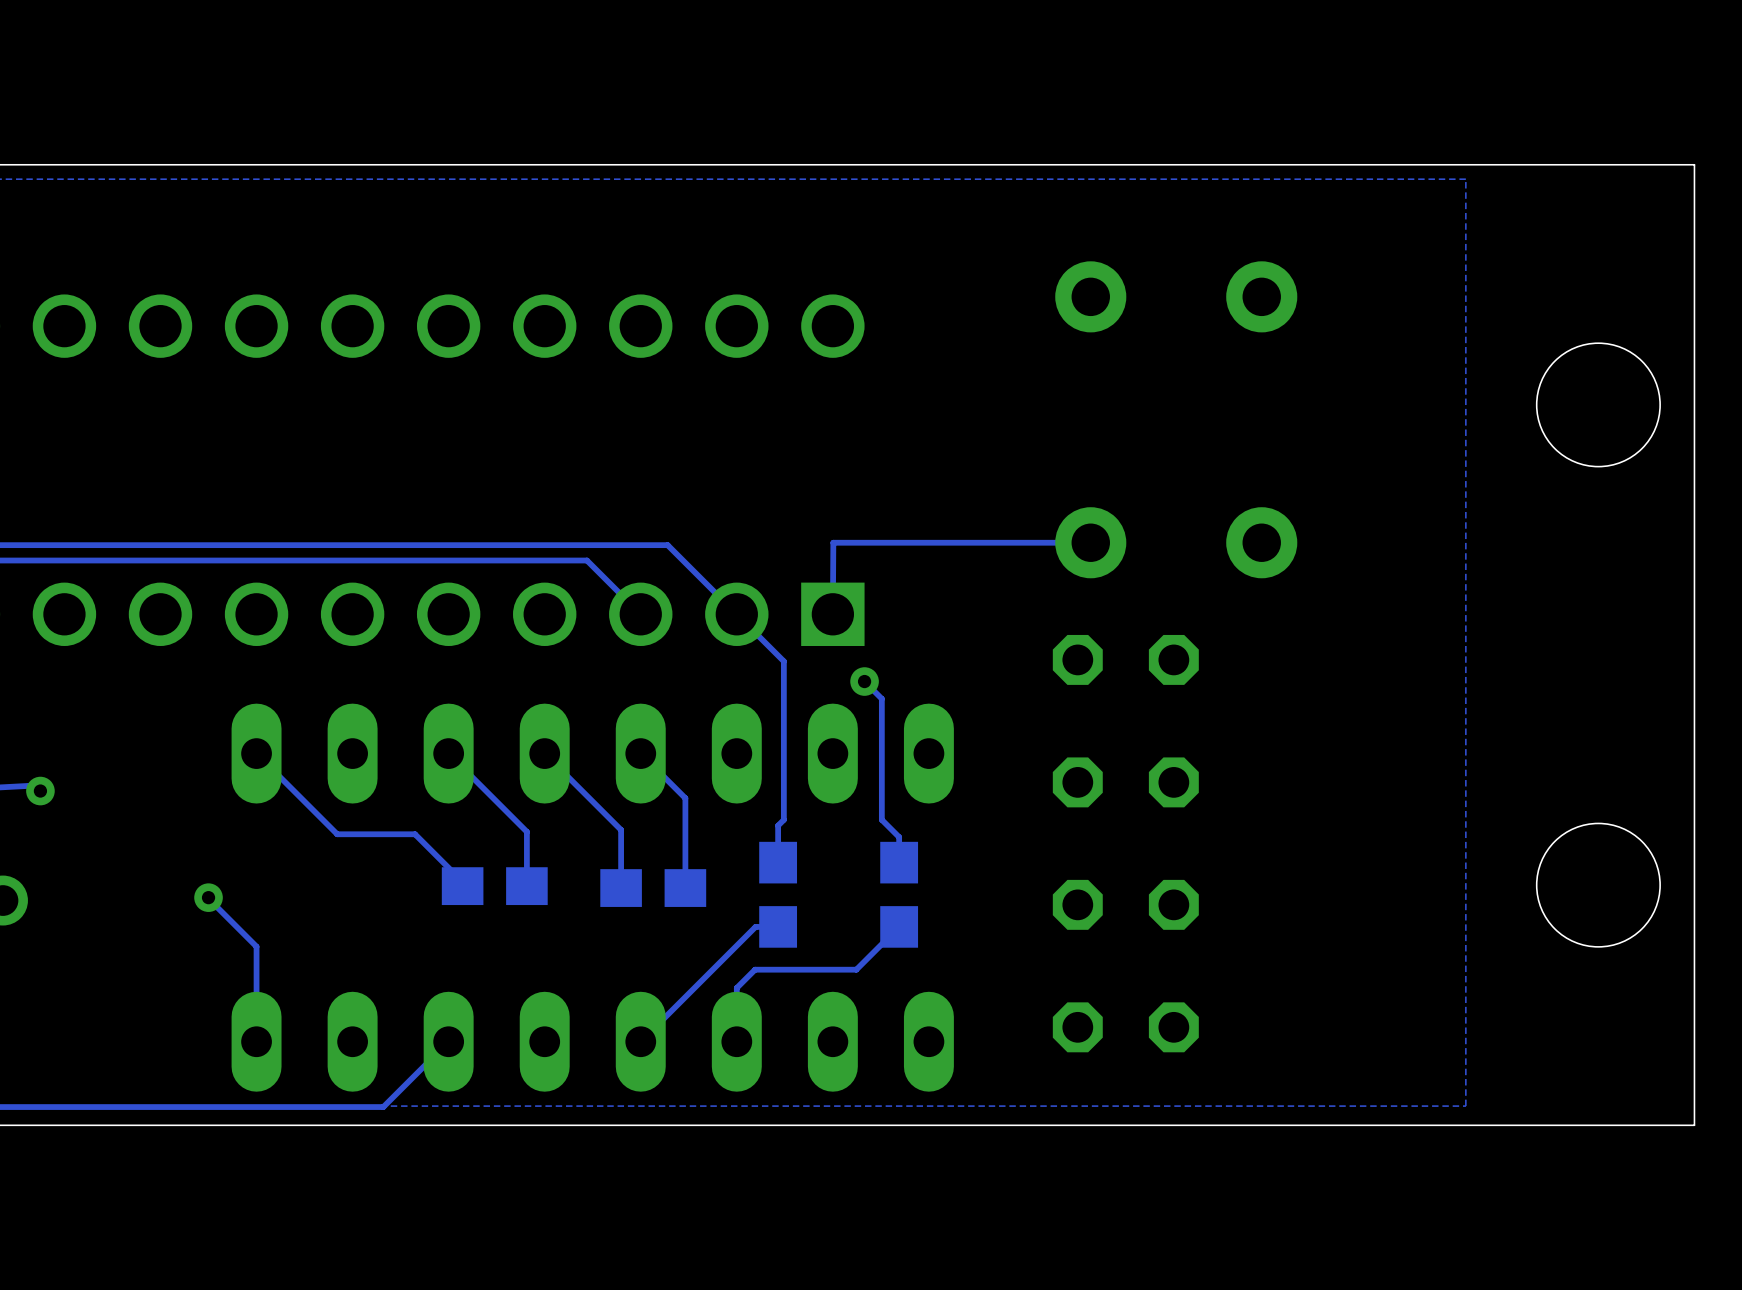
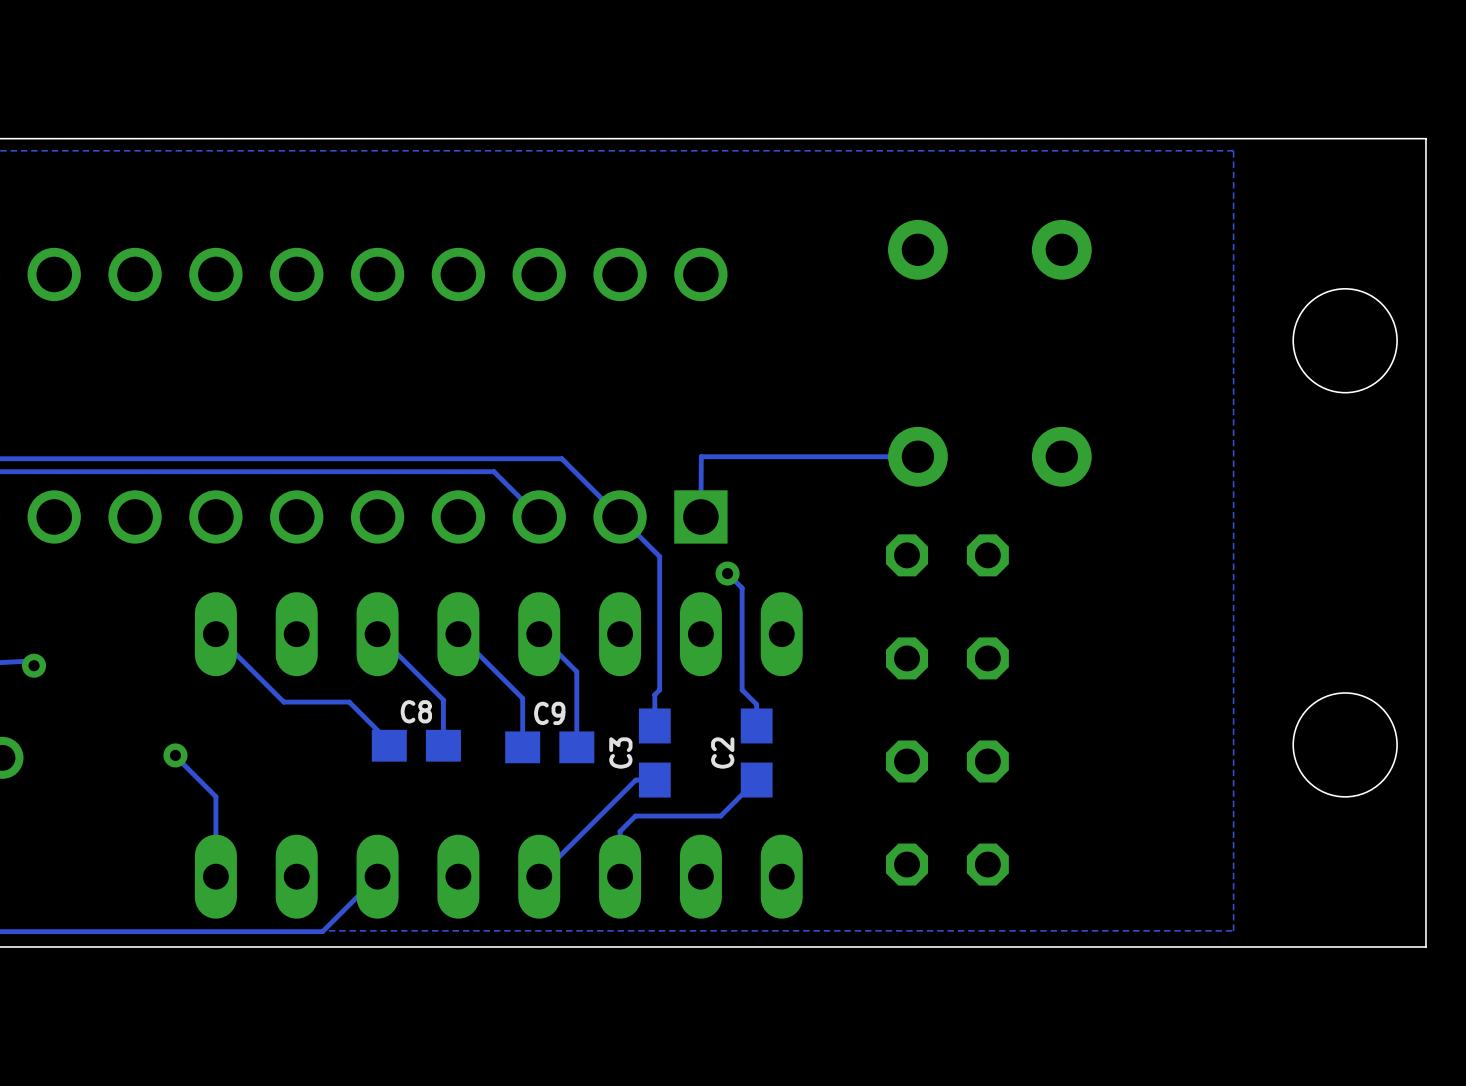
C8 name: none -> C8 (416, 711)
C9 name: none -> C9 (549, 713)
C3 name: none -> C3 (620, 753)
C2 name: none -> C2 (722, 753)

